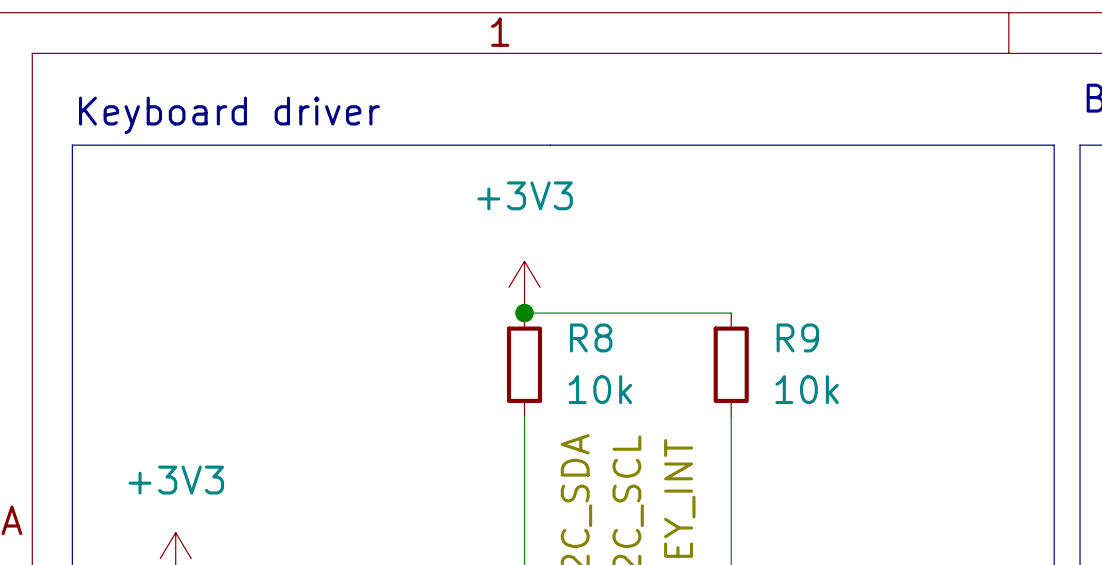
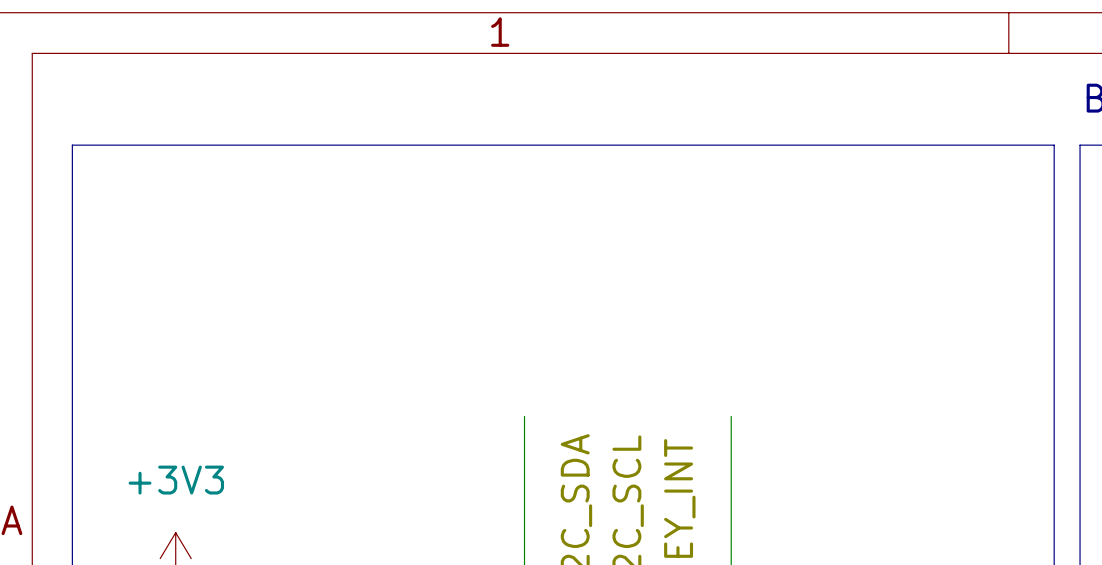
text: Keyboard driver (229, 115) -> none
power symbol: +3V3 (524, 287) -> none
wire: (524, 313) (731, 313) -> none
junction: (524, 313) -> none
R8: 10k (524, 364) -> none
R9: 10k (731, 364) -> none

